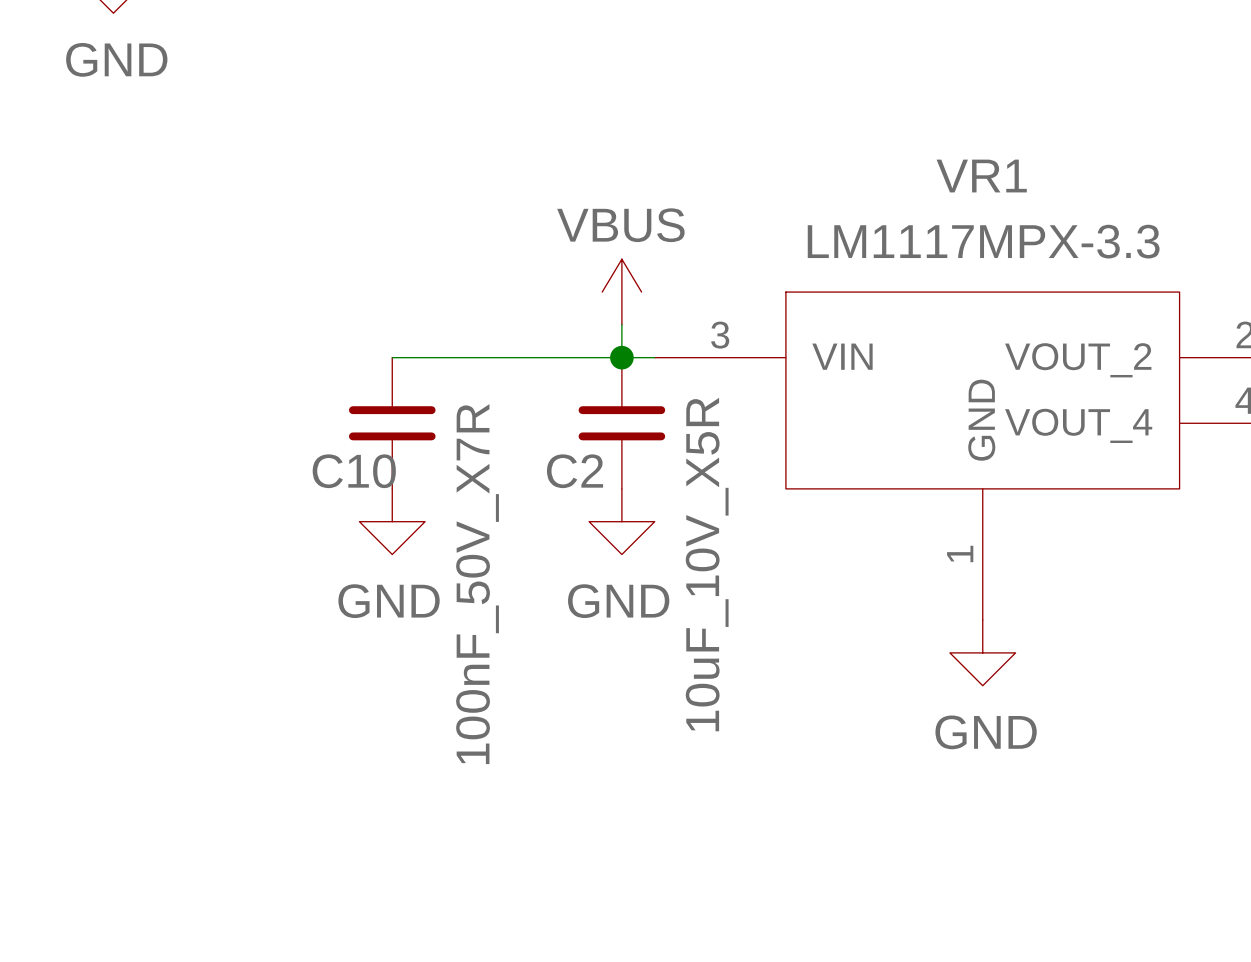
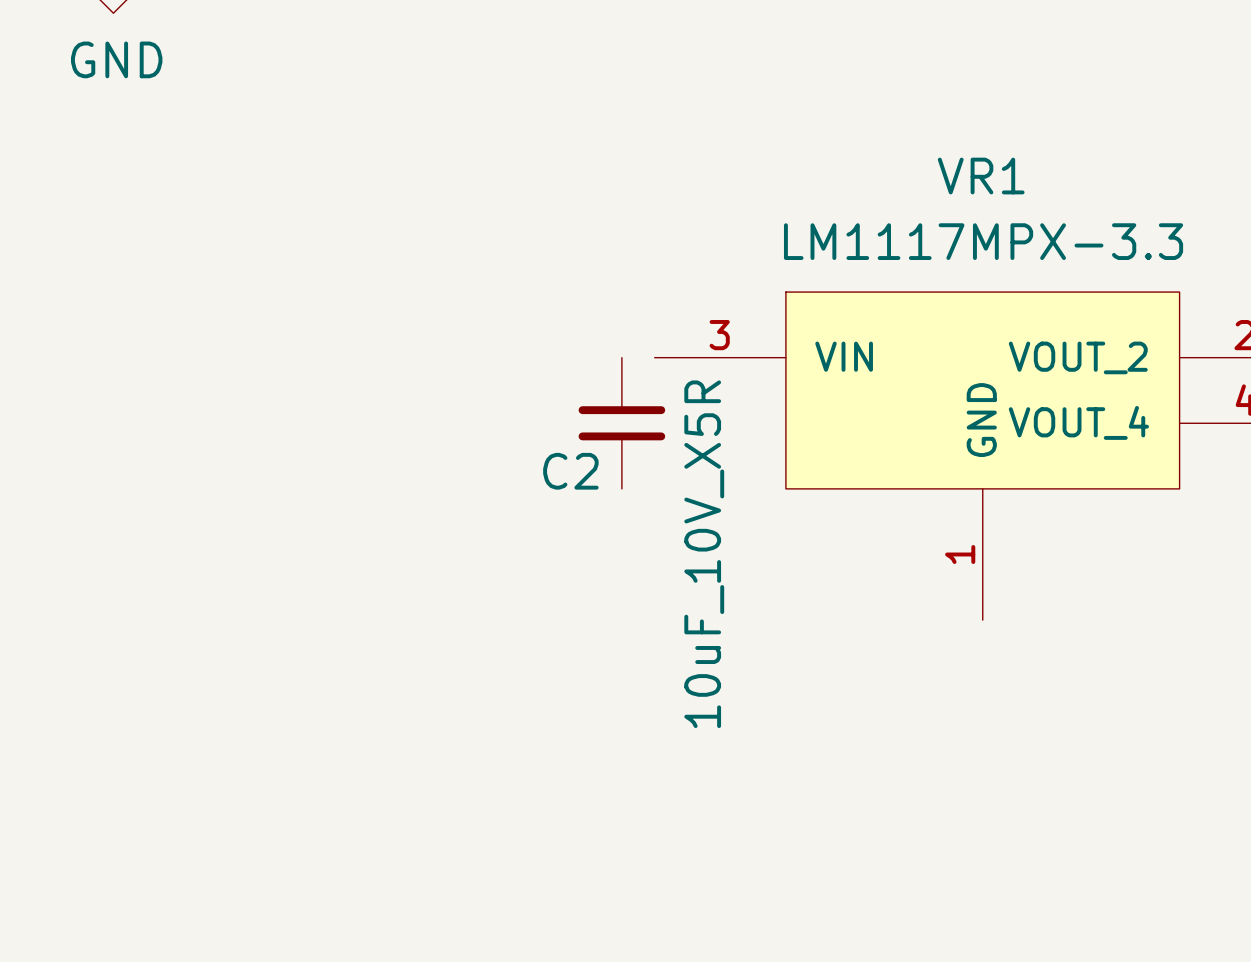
power symbol: VBUS (621, 292) -> none
wire: (621, 324) (621, 357) -> none
wire: (392, 357) (654, 357) -> none
junction: (621, 357) -> none
C10: 100nF_50V_X7R (392, 423) -> none
power symbol: GND (392, 521) -> none
power symbol: GND (621, 521) -> none
power symbol: GND (982, 652) -> none

